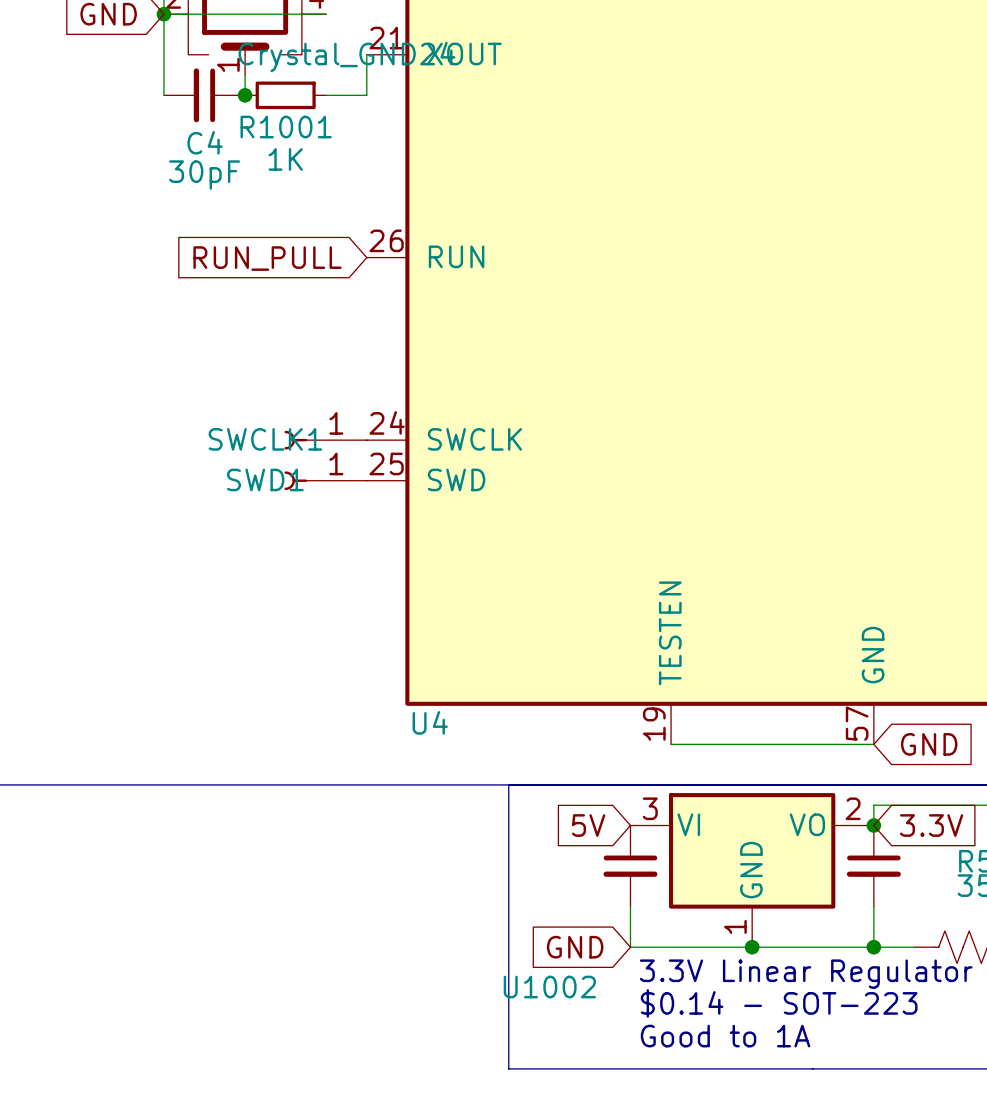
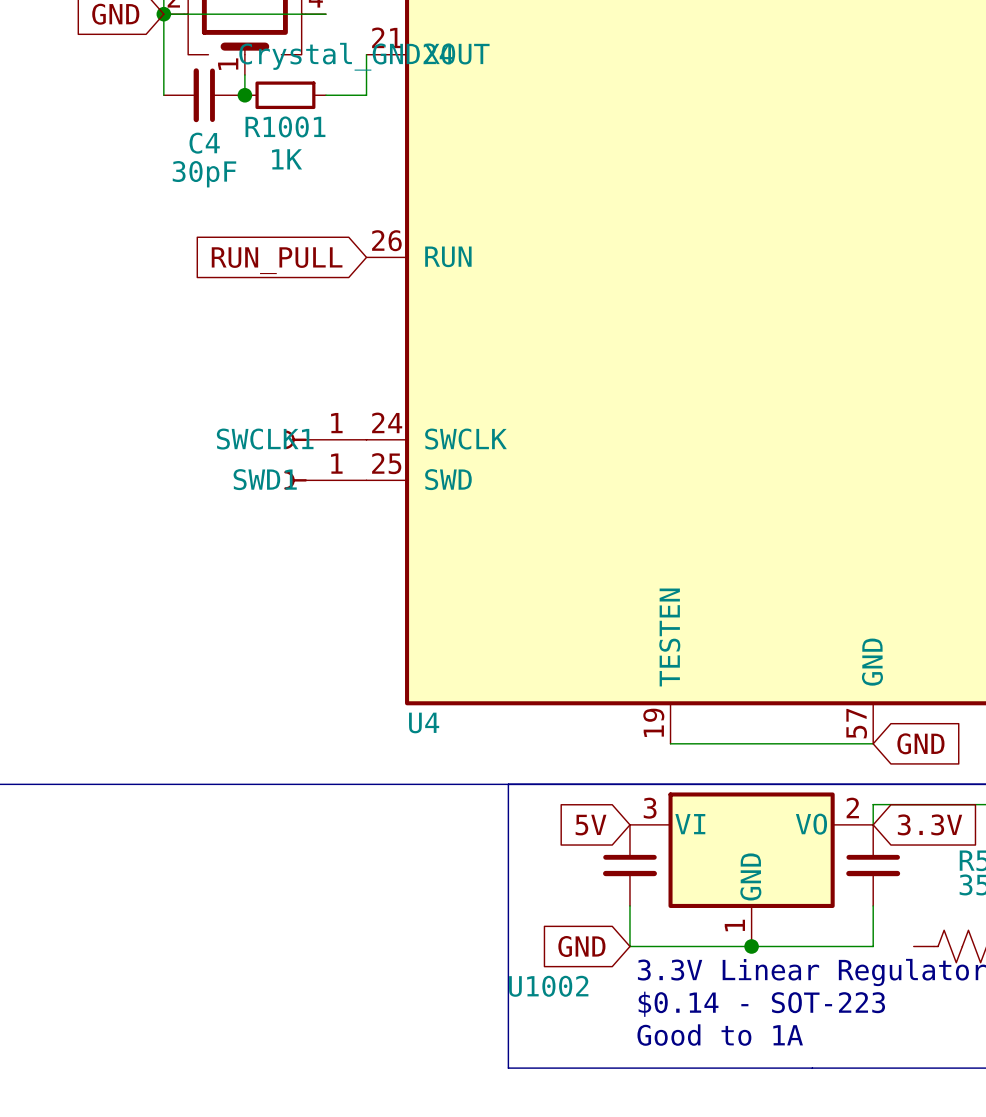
junction: (873, 825) -> none
wire: (873, 947) (914, 947) -> none
junction: (873, 947) -> none

